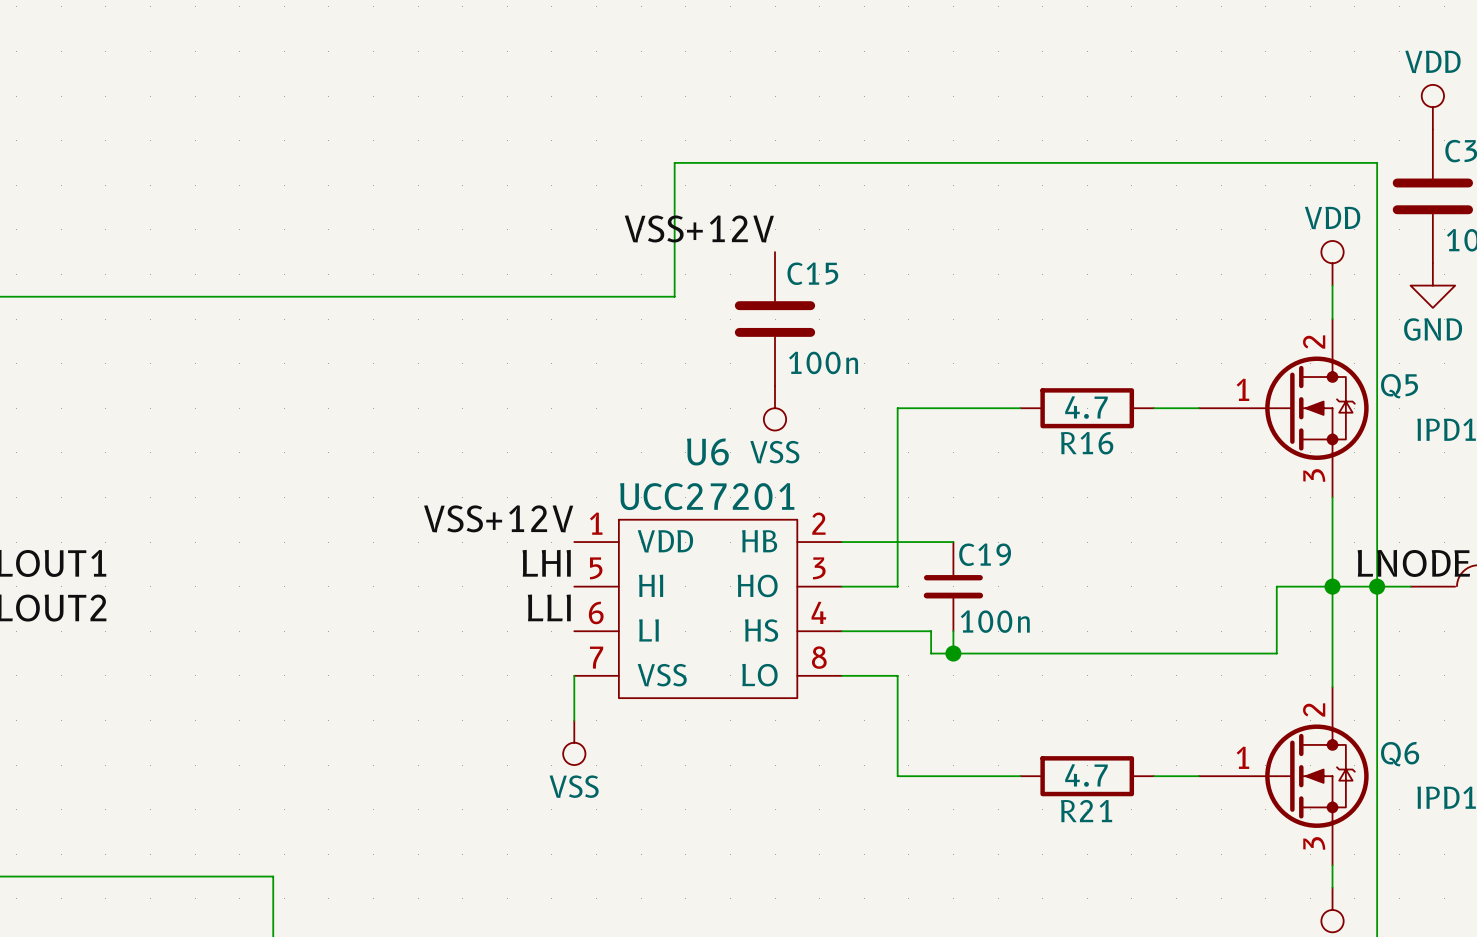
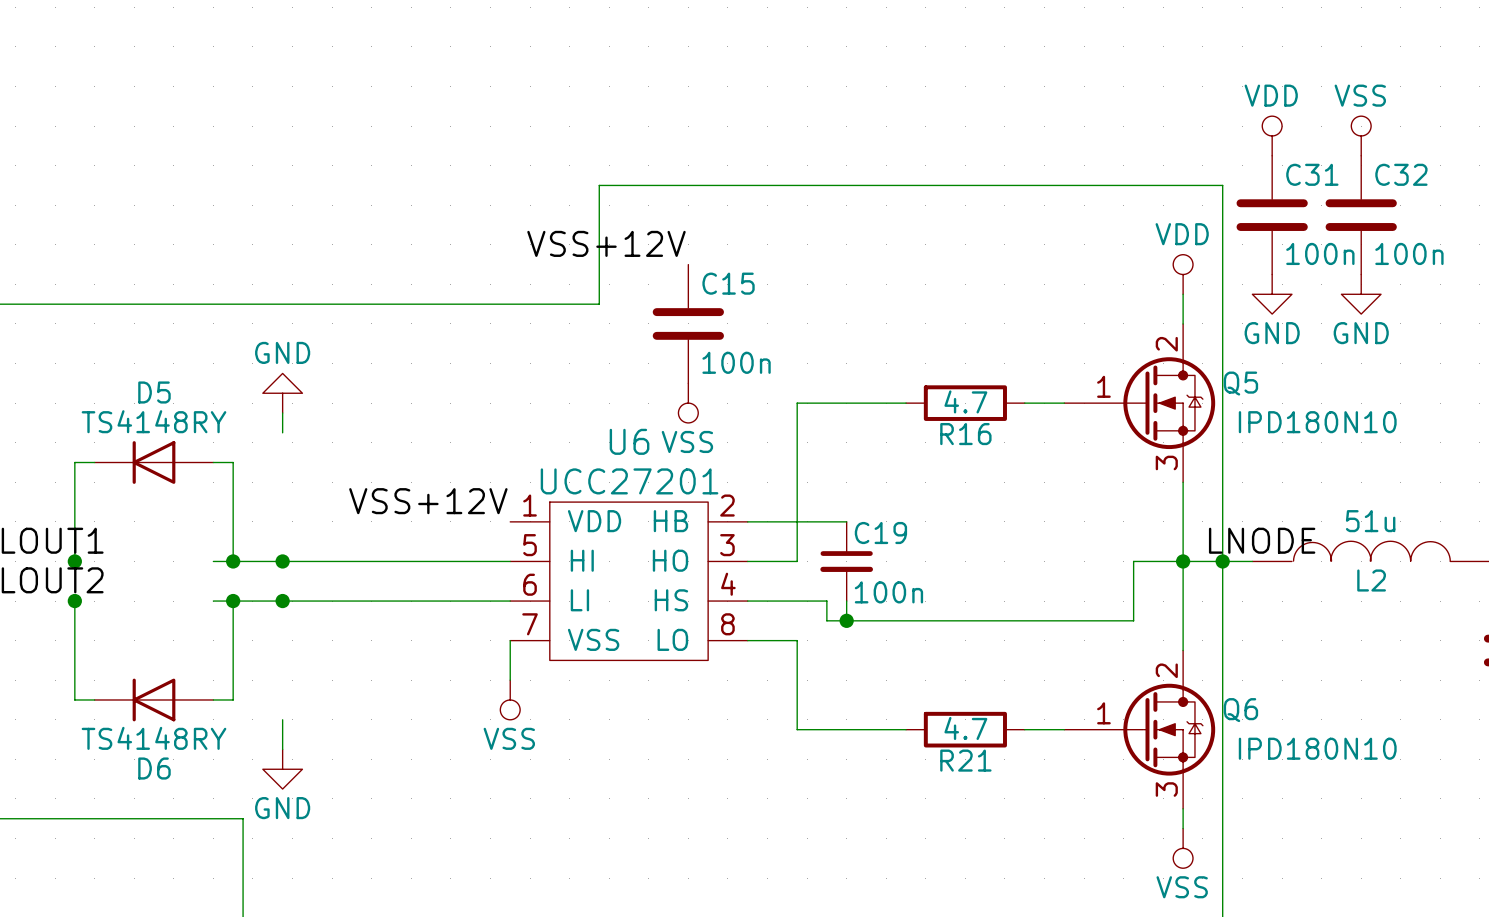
power symbol: none -> GND (282, 393)
wire: none -> (282, 413) (282, 432)
wire: none -> (94, 462) (74, 462) (74, 561)
D5: none -> TS4148RY (154, 462)
wire: none -> (213, 462) (233, 462) (233, 561)
label: LHI (546, 563) -> none
junction: none -> (74, 561)
wire: none -> (213, 561) (510, 561)
junction: none -> (233, 561)
junction: none -> (282, 561)
label: LLI (549, 607) -> none
wire: none -> (74, 601) (74, 699) (94, 699)
junction: none -> (74, 601)
wire: none -> (213, 601) (510, 601)
wire: none -> (233, 601) (233, 699) (213, 699)
junction: none -> (233, 601)
junction: none -> (282, 601)
D6: none -> TS4148RY (154, 699)
wire: none -> (282, 719) (282, 749)
power symbol: none -> GND (282, 769)

